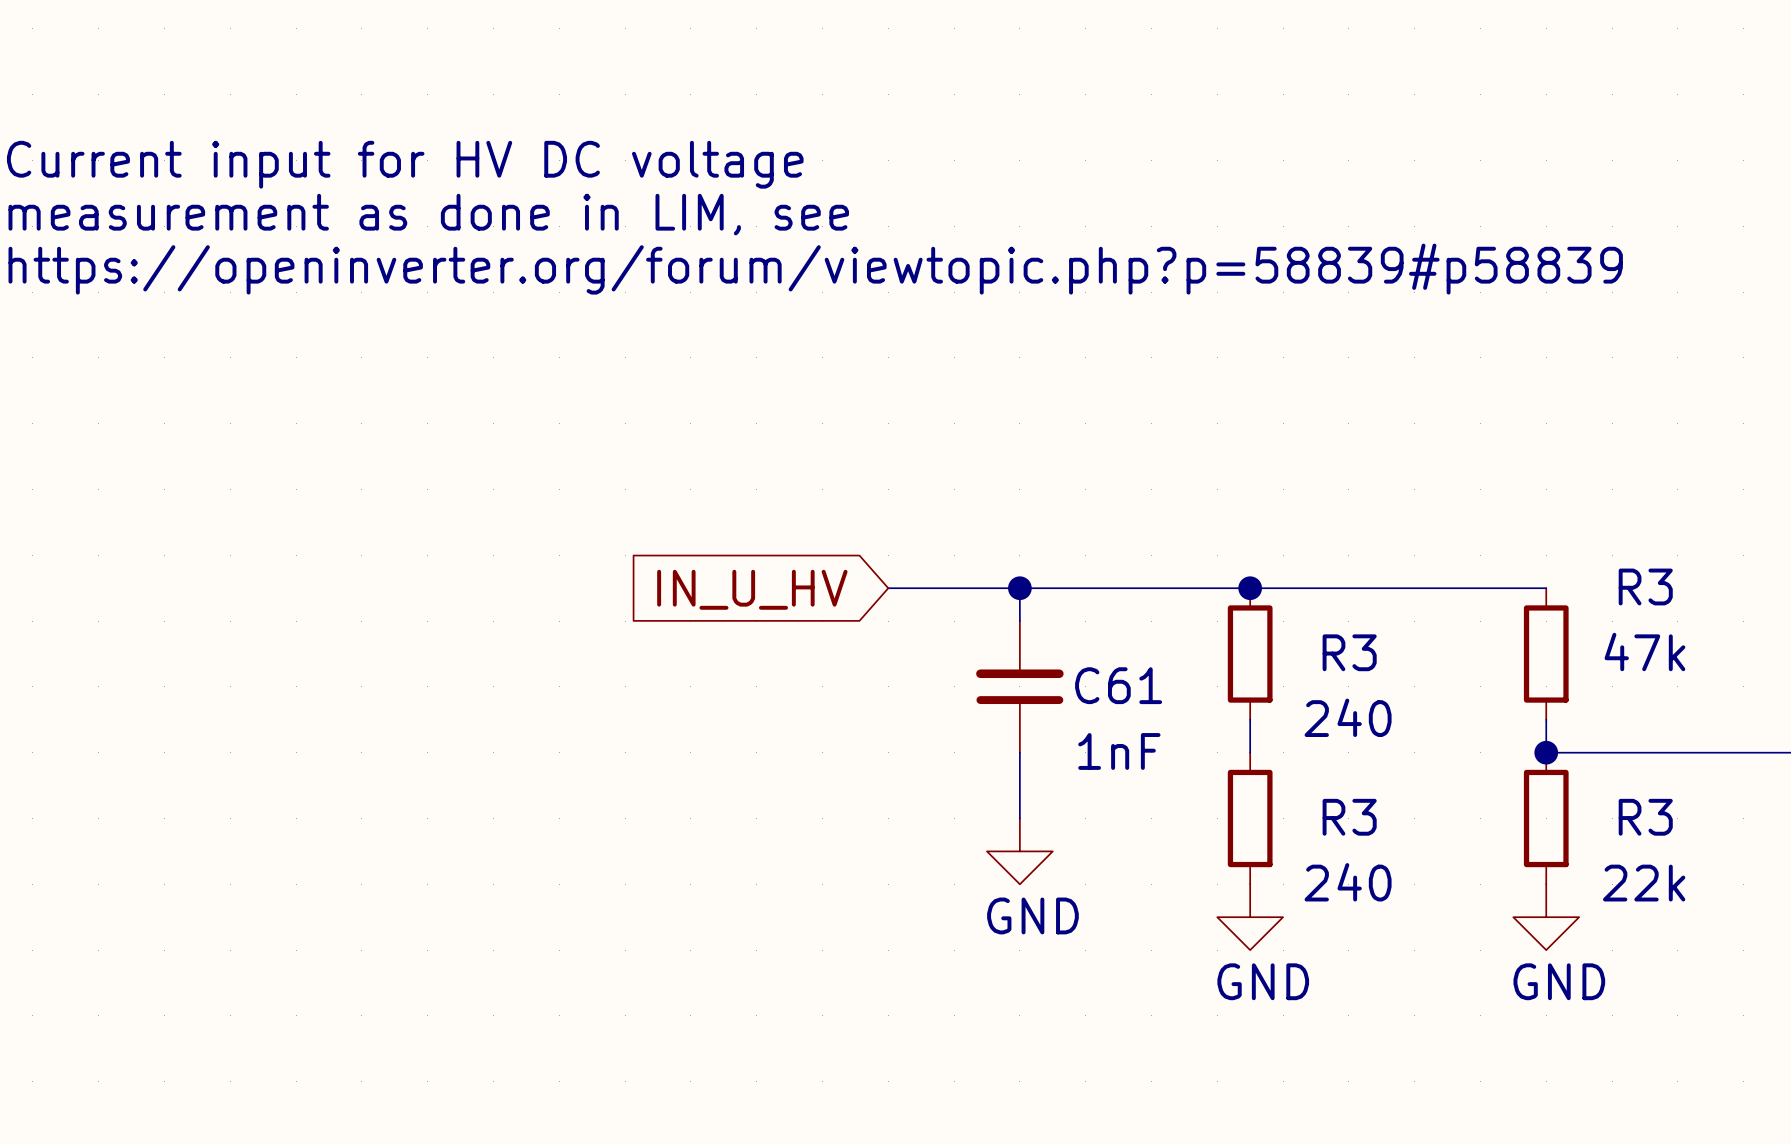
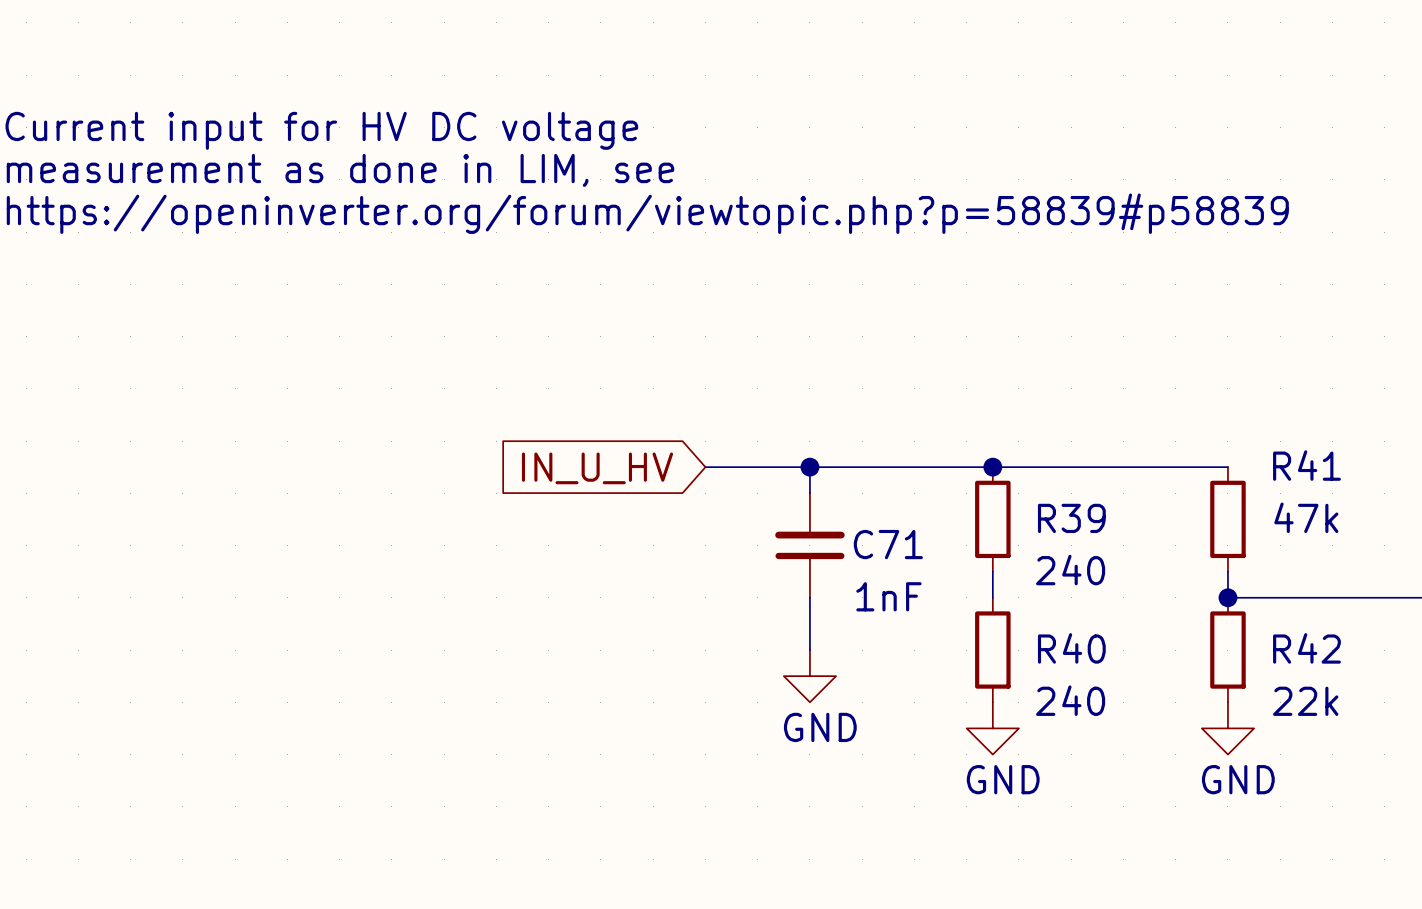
R3 name: R3 (1645, 586) -> R41 (1306, 465)
R3 name: R3 (1349, 652) -> R39 (1071, 518)
C61 name: C61 (1118, 685) -> C71 (888, 544)
R3 name: R3 (1349, 817) -> R40 (1071, 648)
R3 name: R3 (1645, 817) -> R42 (1306, 648)

